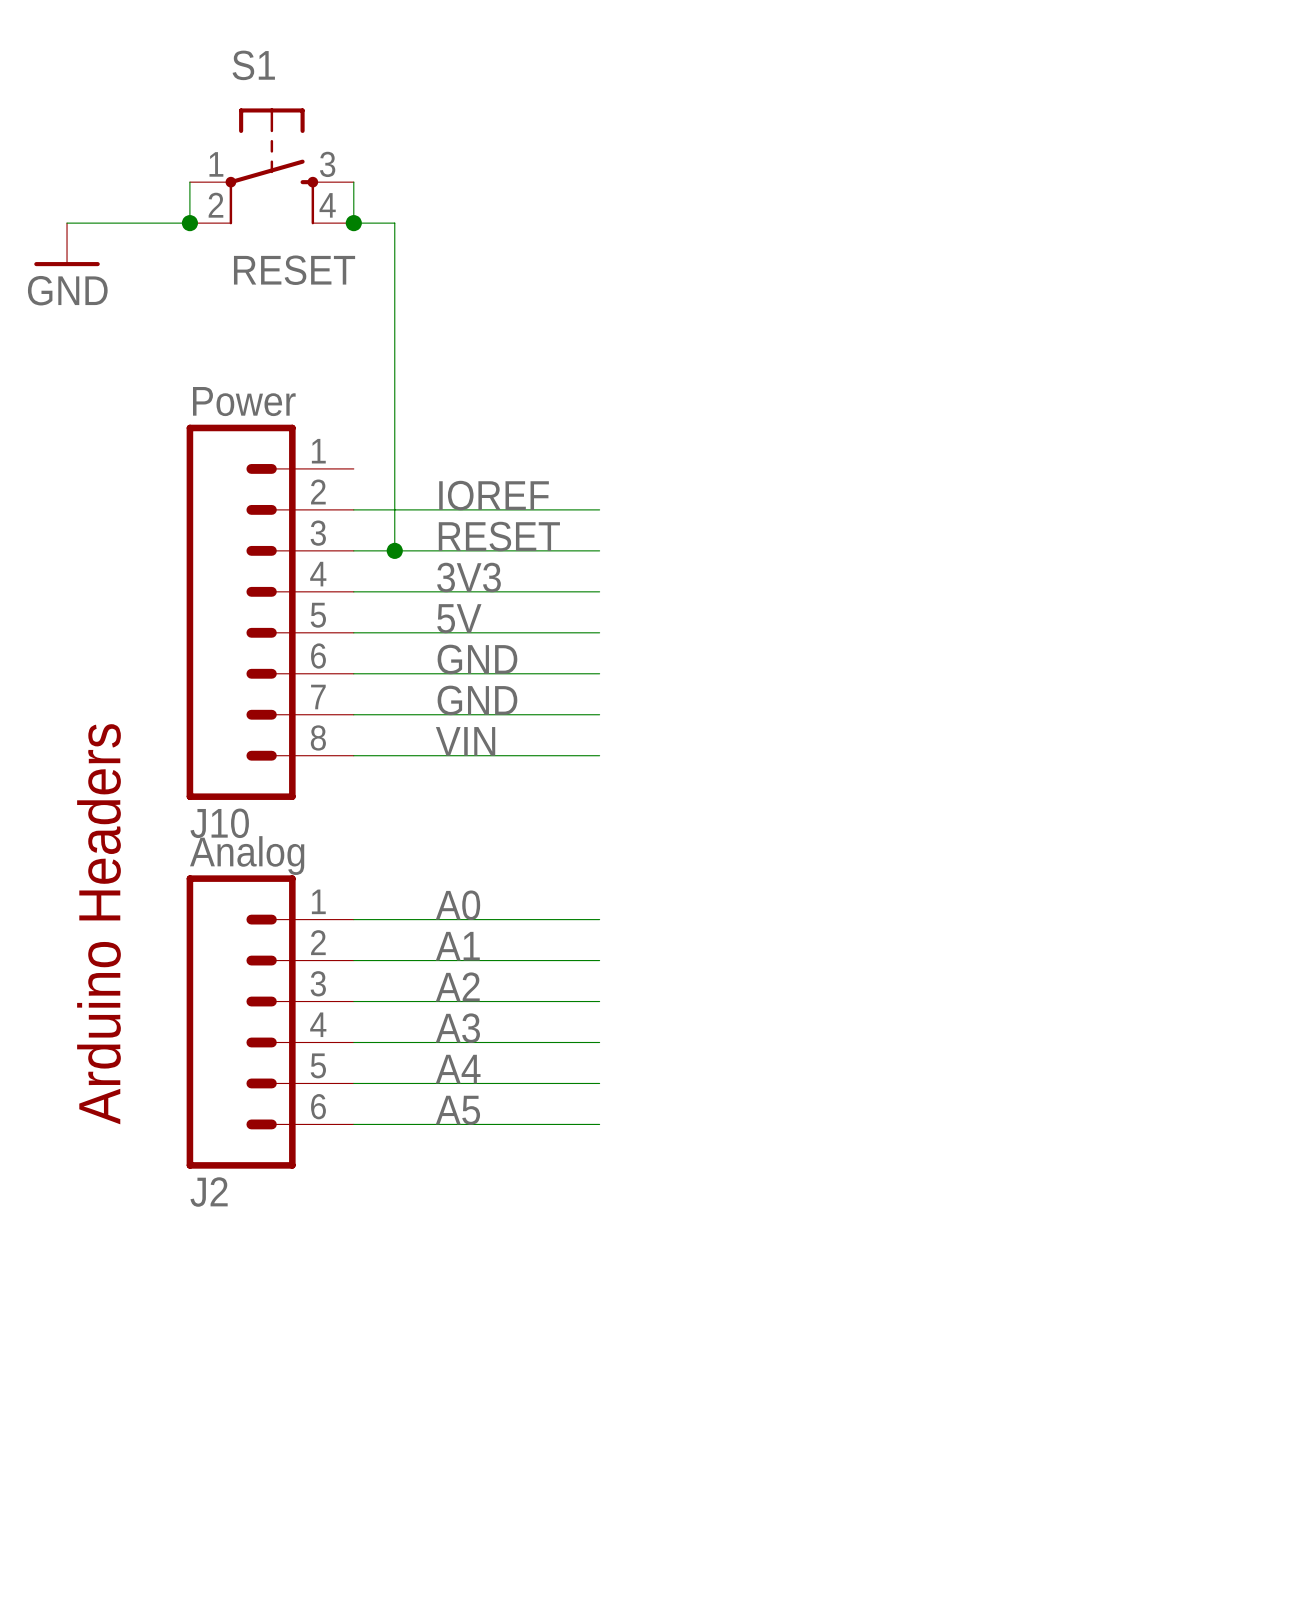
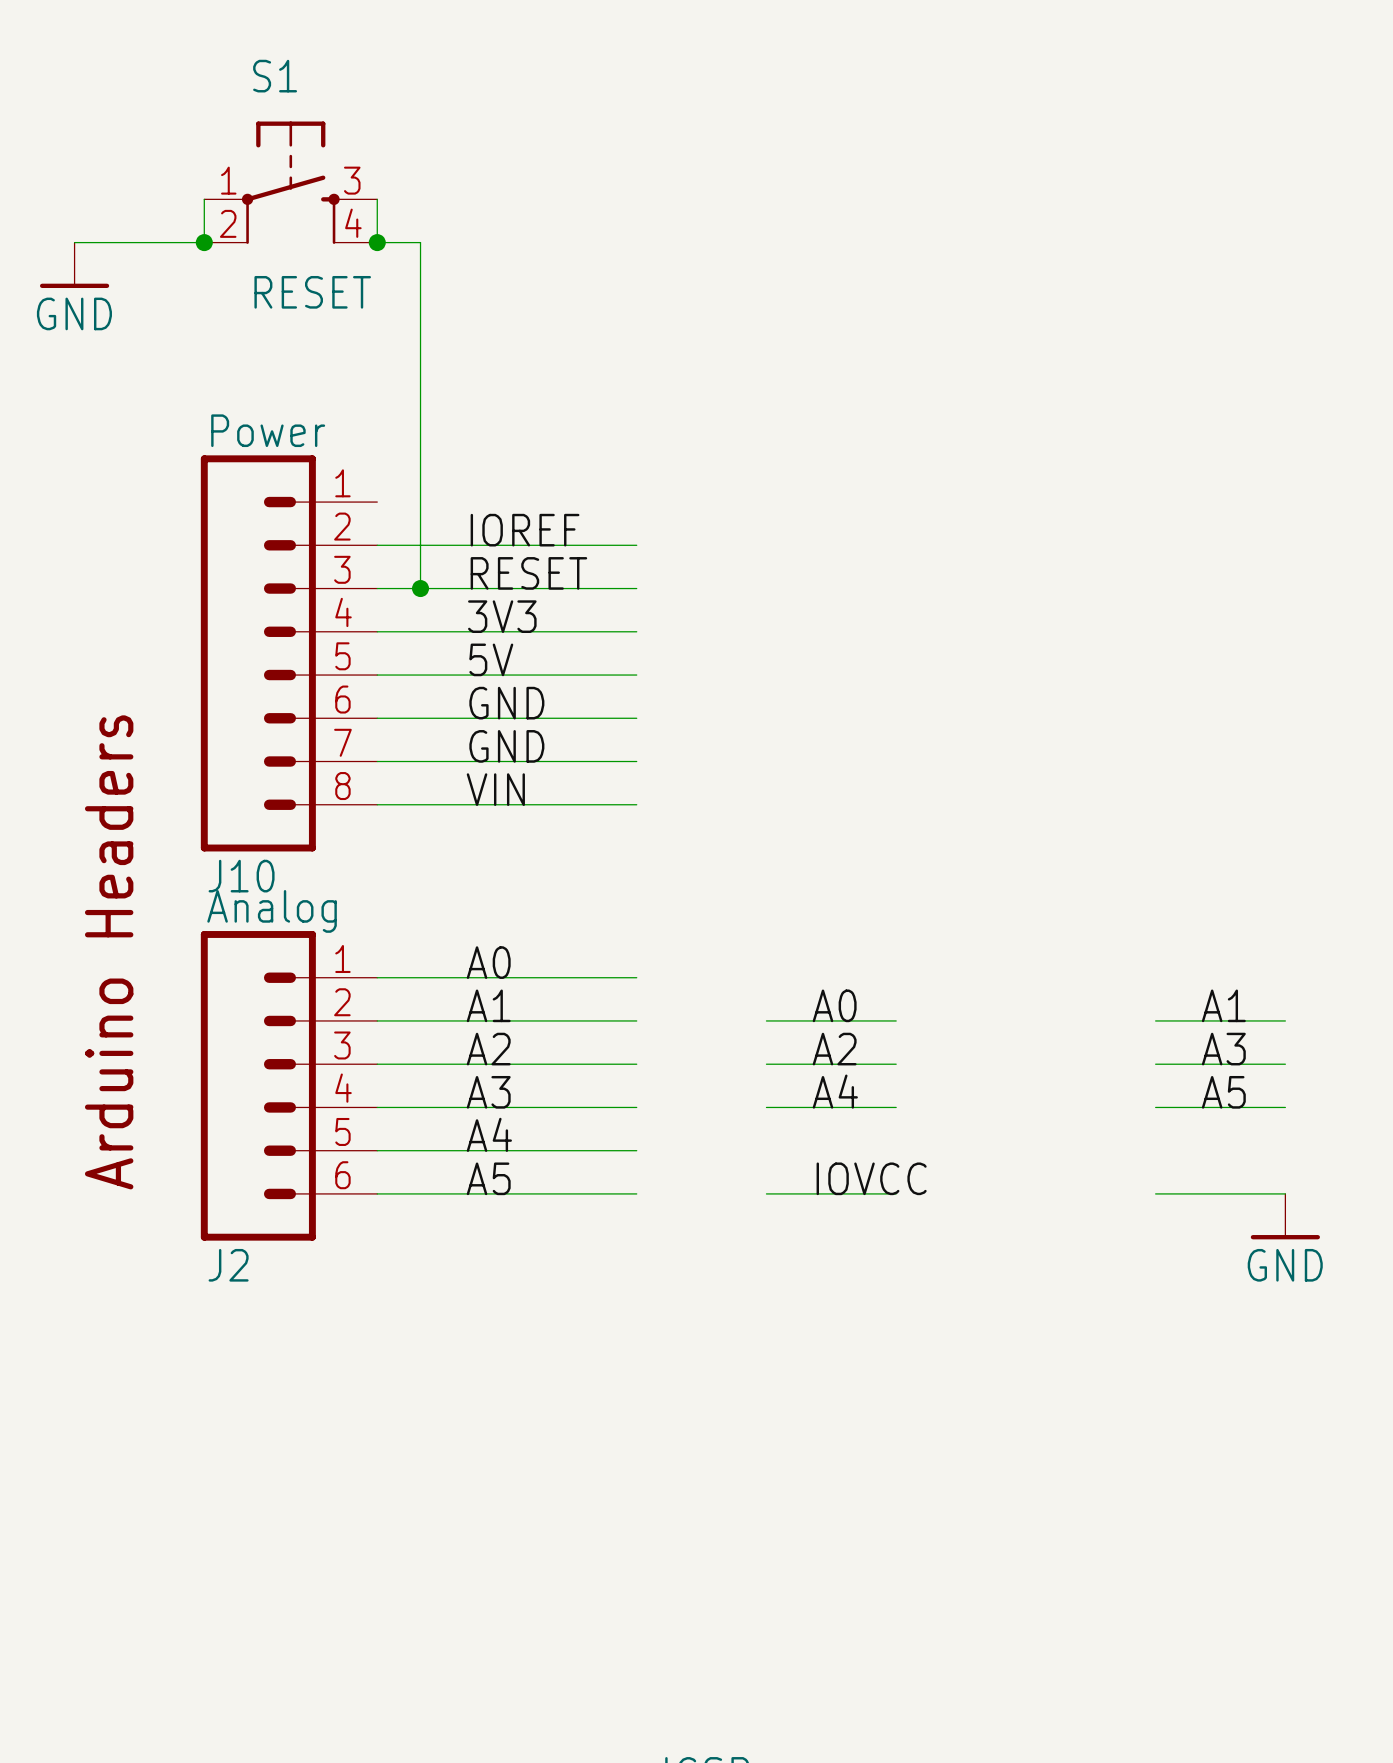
label: none -> A0 (834, 1005)
label: none -> A1 (1223, 1005)
wire: none -> (766, 1020) (896, 1020)
wire: none -> (1155, 1020) (1285, 1020)
label: none -> A2 (834, 1049)
label: none -> A3 (1223, 1049)
wire: none -> (766, 1064) (896, 1064)
wire: none -> (1155, 1064) (1285, 1064)
label: none -> A4 (835, 1091)
label: none -> A5 (1223, 1092)
wire: none -> (766, 1107) (896, 1107)
wire: none -> (1155, 1107) (1285, 1107)
label: none -> IOVCC (871, 1178)
wire: none -> (766, 1193) (896, 1193)
wire: none -> (1155, 1193) (1285, 1193)
power symbol: none -> GND (1285, 1216)

